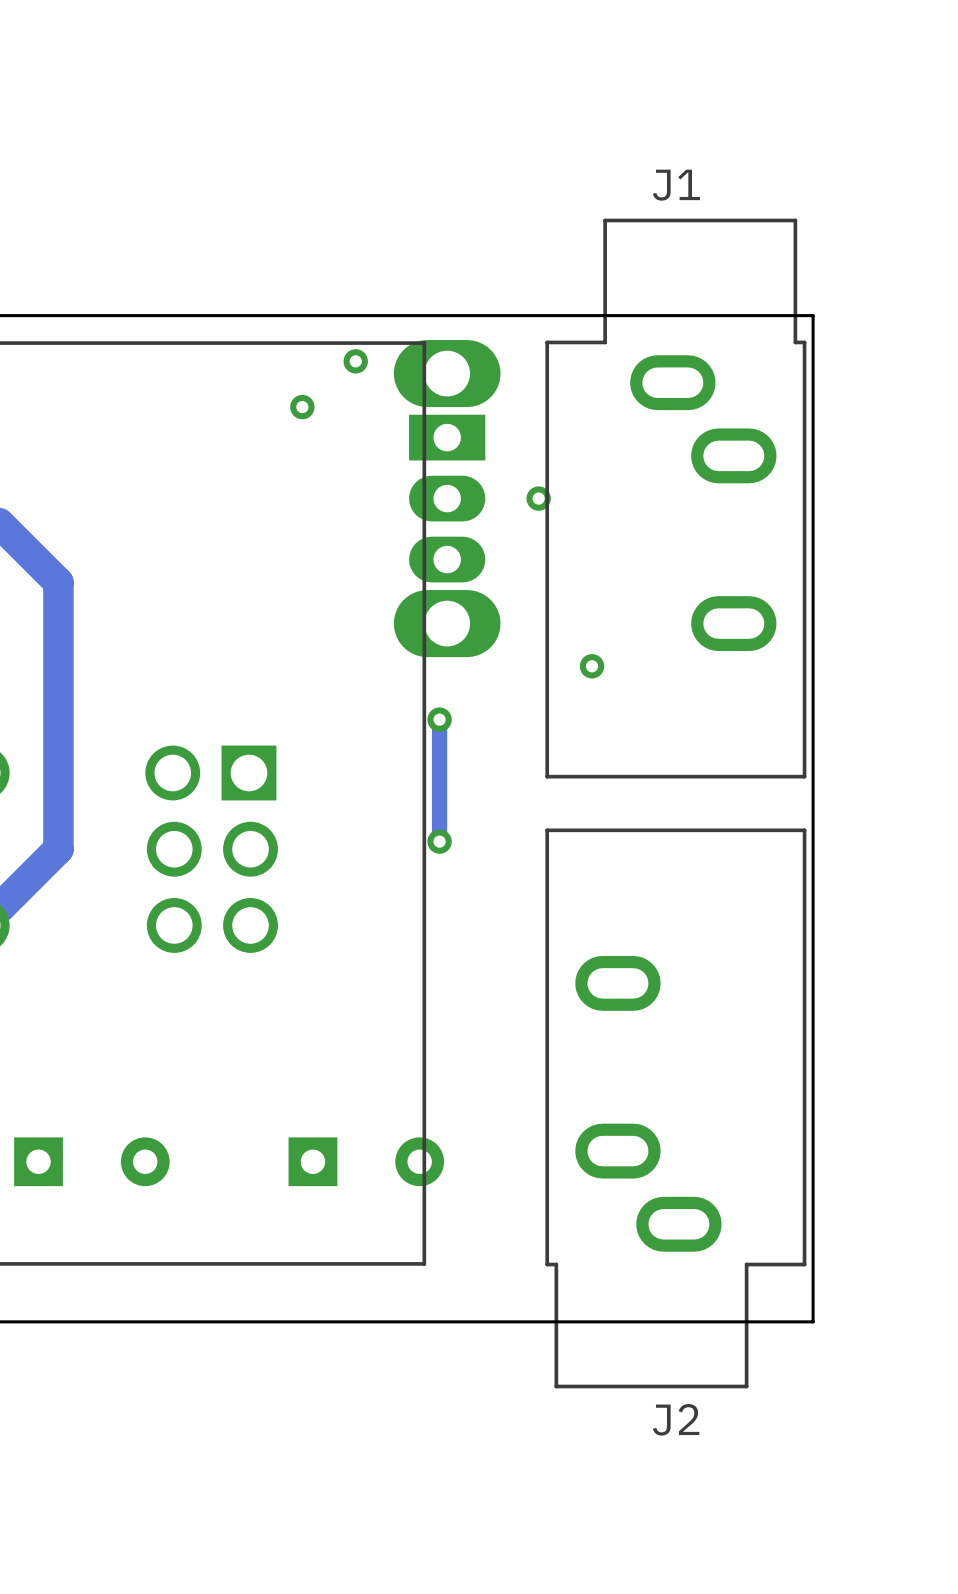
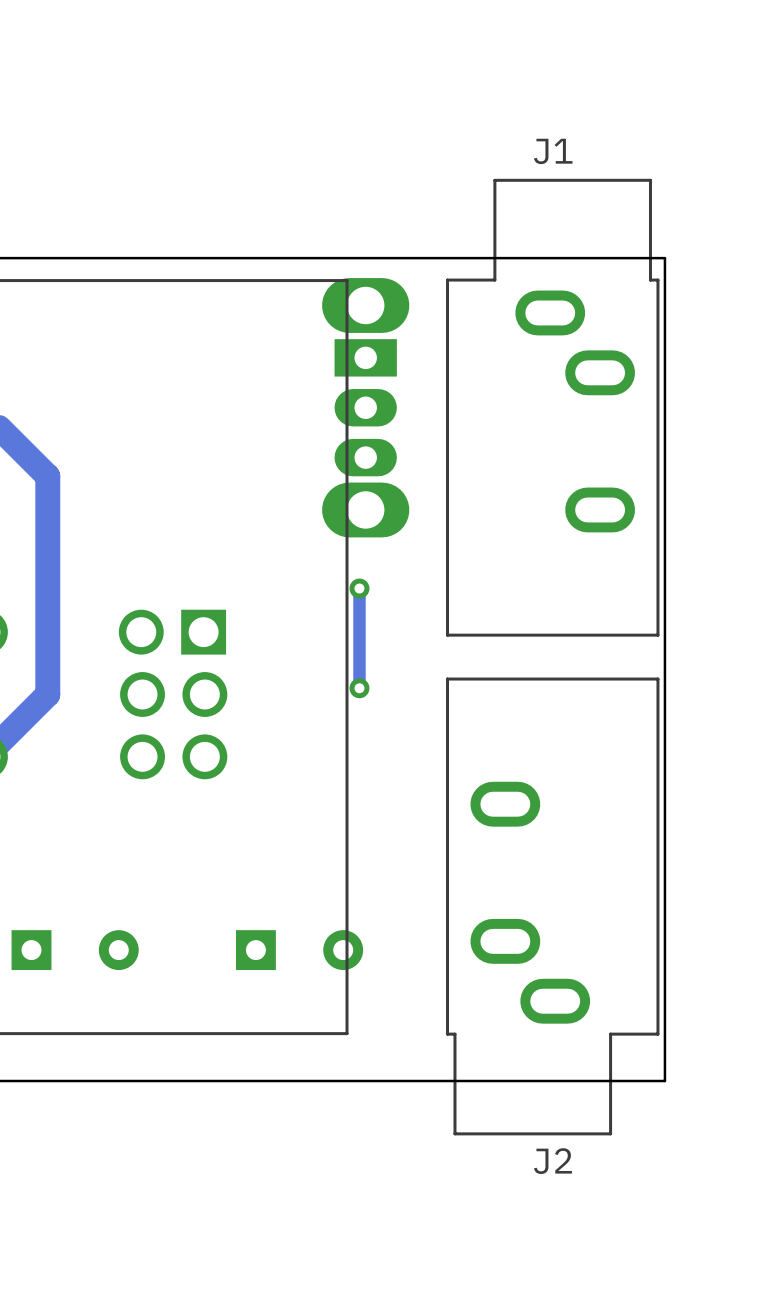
via: (355, 361) -> none
via: (302, 407) -> none
via: (538, 498) -> none
via: (592, 666) -> none

